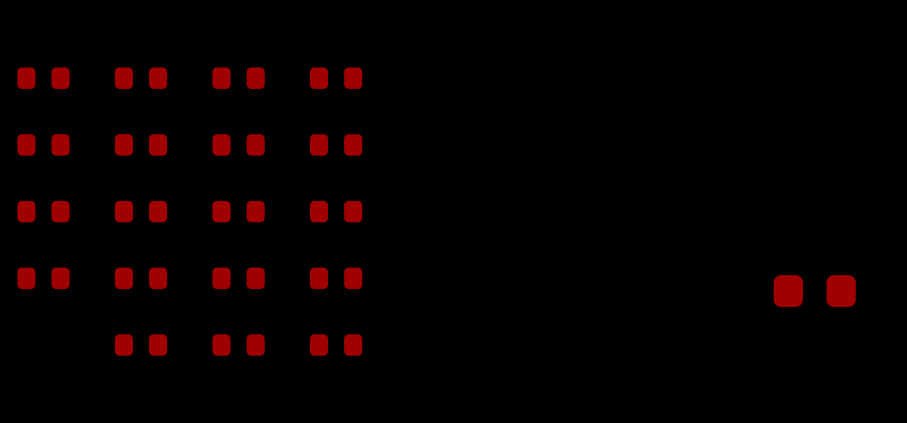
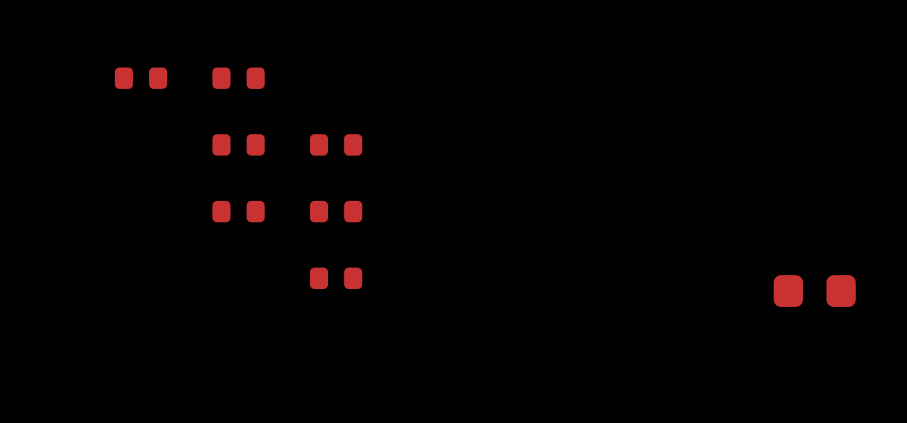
part: (43, 78) -> none
part: (336, 78) -> none
part: (43, 144) -> none
part: (141, 144) -> none
part: (43, 211) -> none
part: (141, 211) -> none
part: (43, 278) -> none
part: (141, 278) -> none
part: (238, 278) -> none
part: (141, 345) -> none
part: (238, 345) -> none
part: (336, 345) -> none

